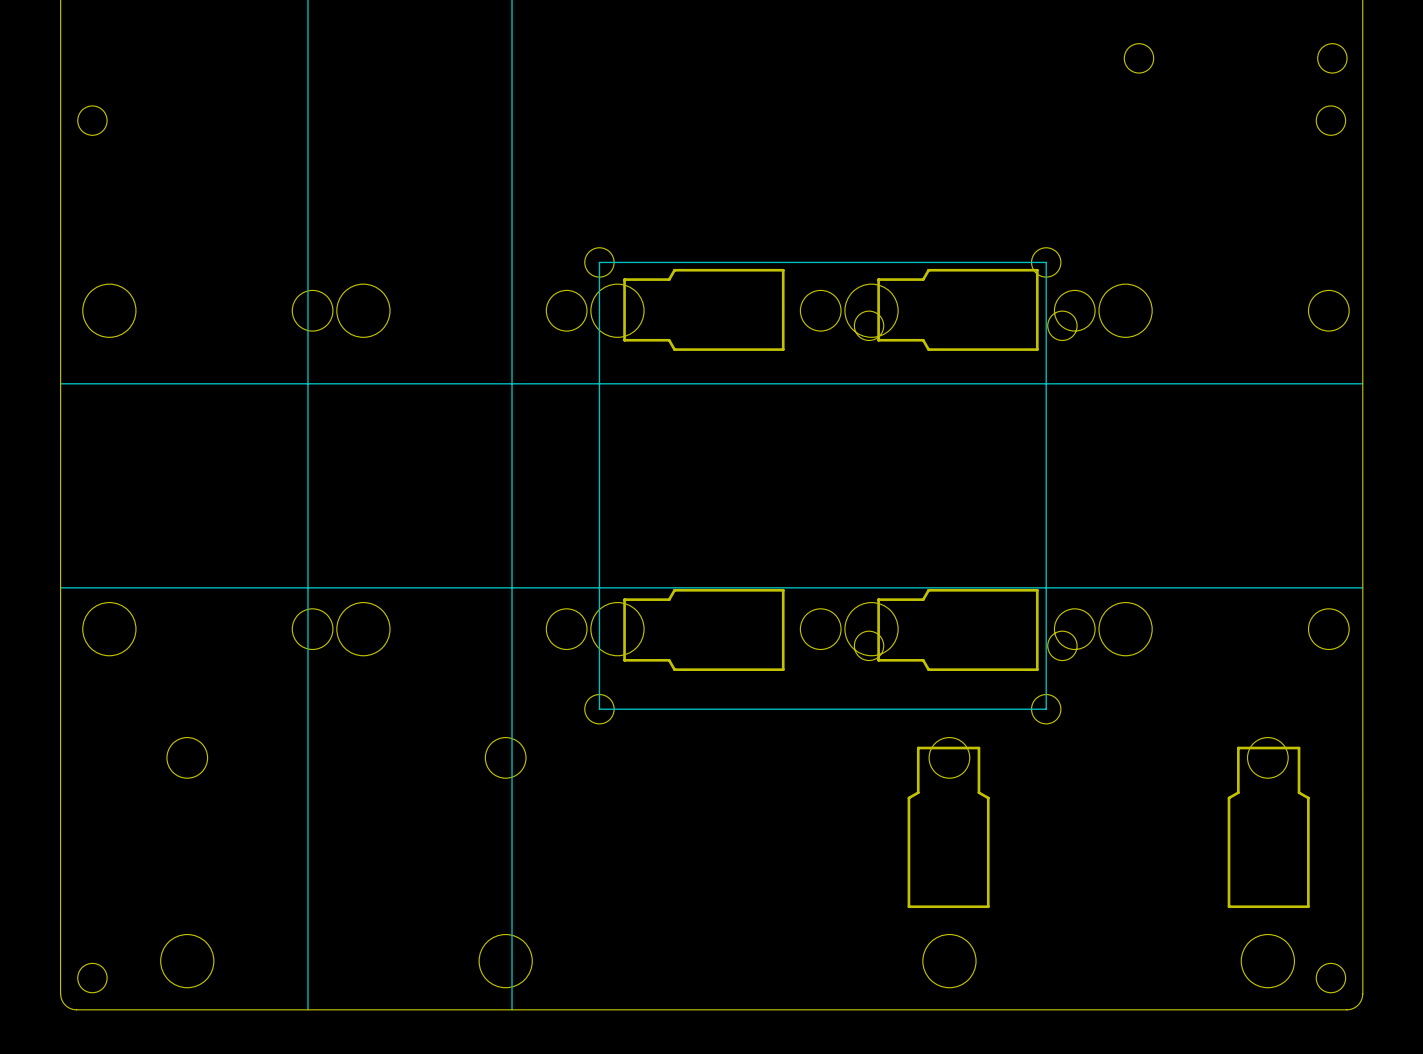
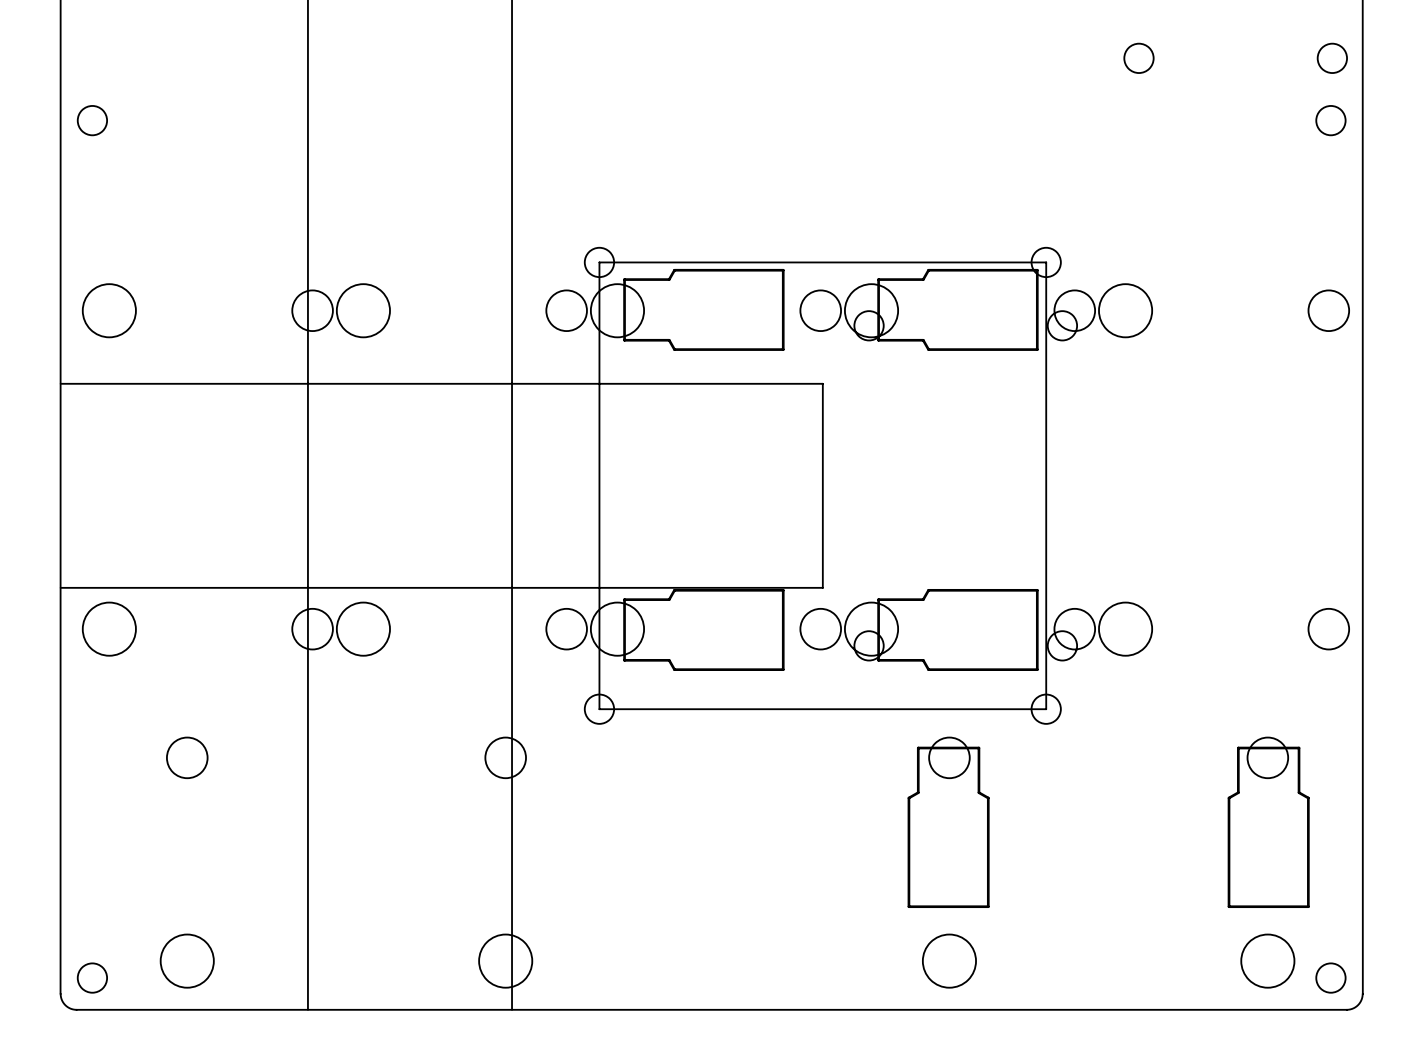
line: (822, 383) (1362, 383) -> (822, 383) (822, 587)
line: (822, 587) (1362, 587) -> none

